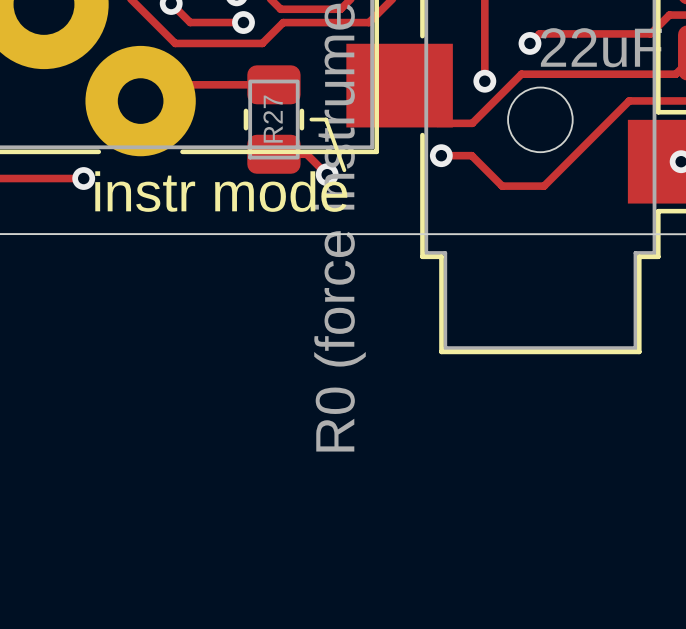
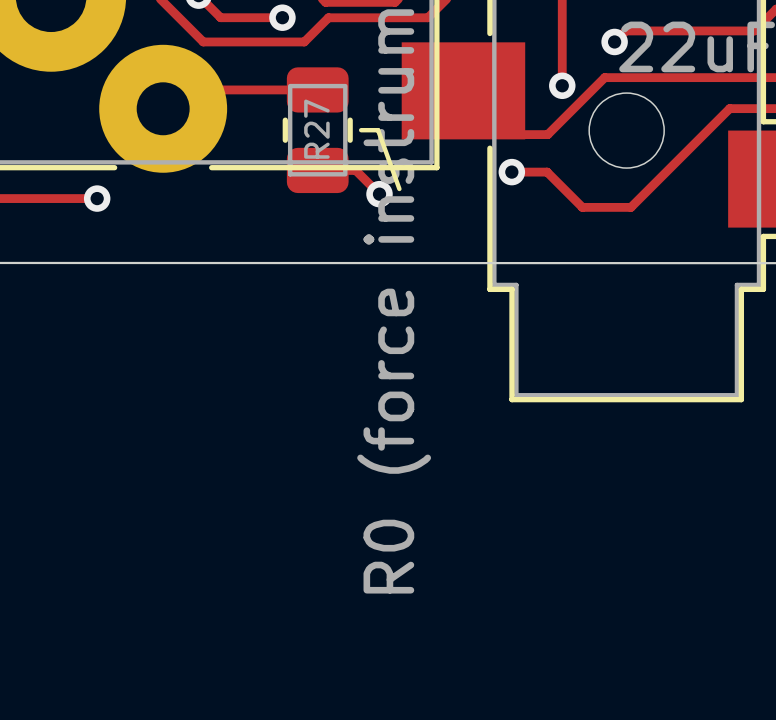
R27 text: instr mode (221, 191) -> none

